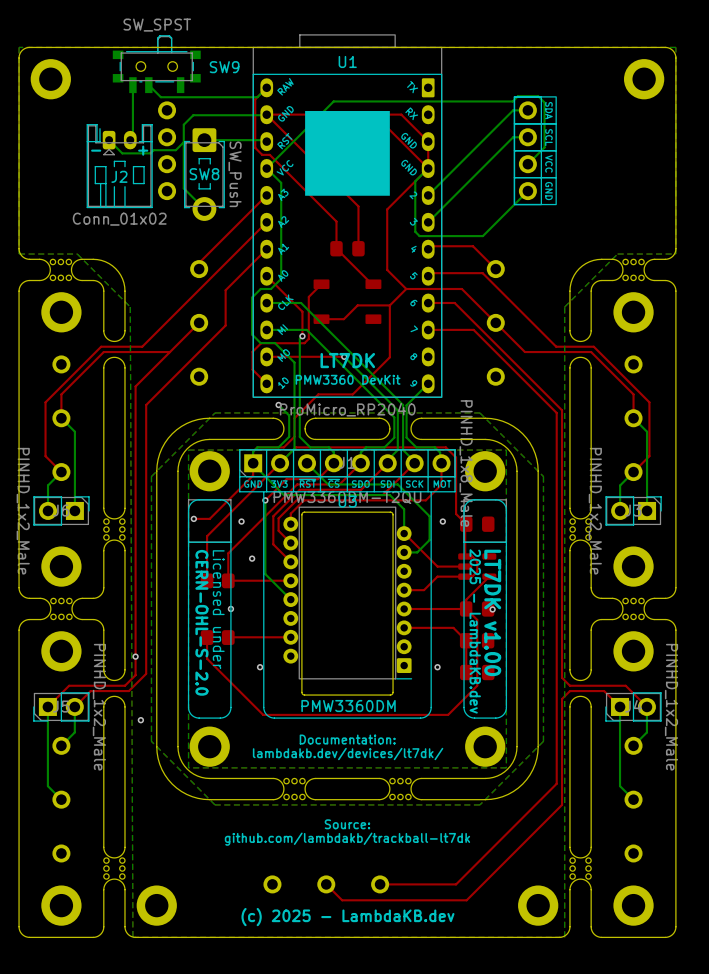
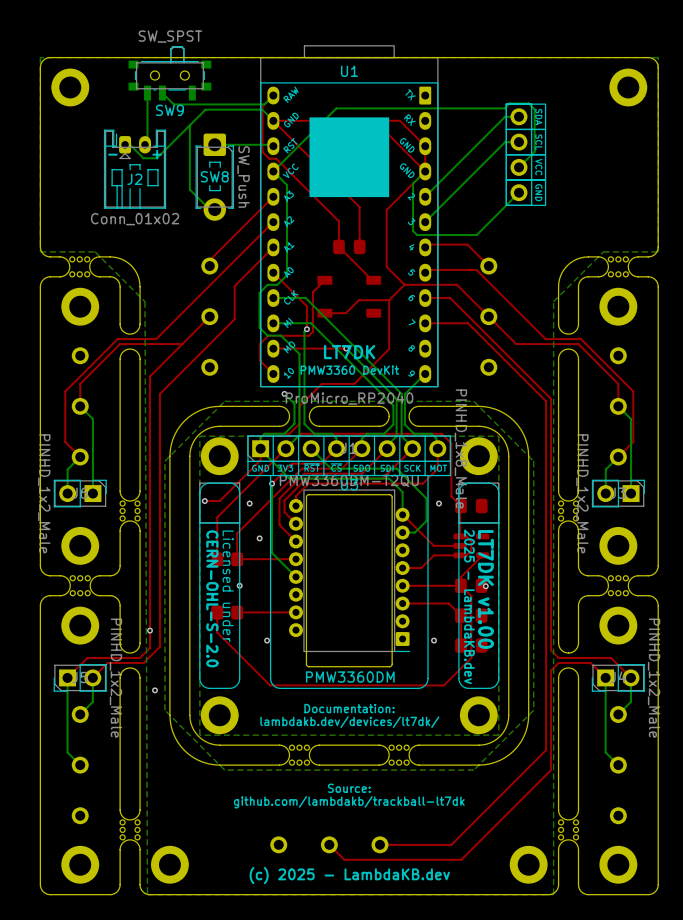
SW9 name position: SW9 (224, 67) -> SW9 (169, 110)
bottom track: (266, 114) (193, 115) (183, 124) (183, 188) (204, 209) -> (273, 120) (262, 109) (205, 109) (156, 158) (143, 158) (130, 144)
bottom track: none -> (189, 125) (189, 189) (209, 209)
bottom track: (109, 140) (122, 153) (150, 153) (153, 150) (175, 150) (183, 142) -> none
part: (167, 150) -> none

